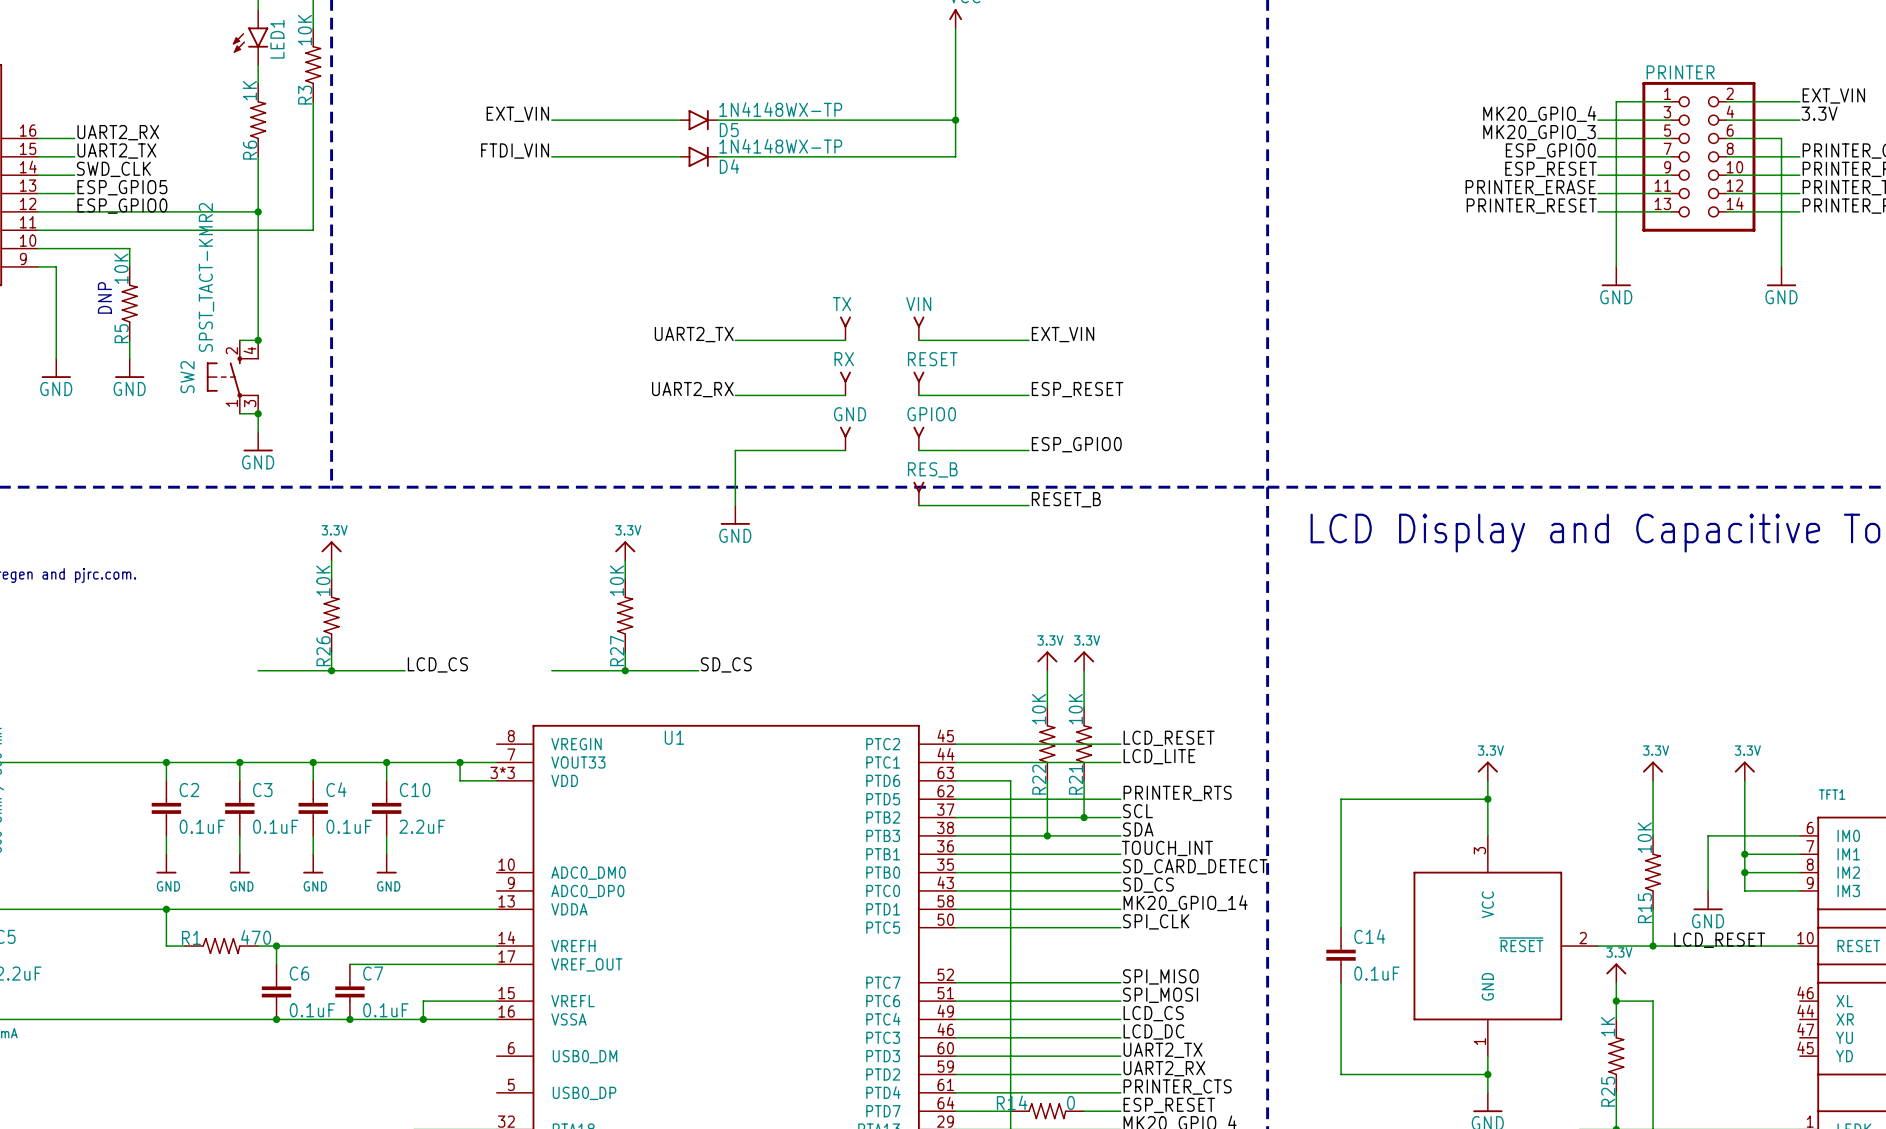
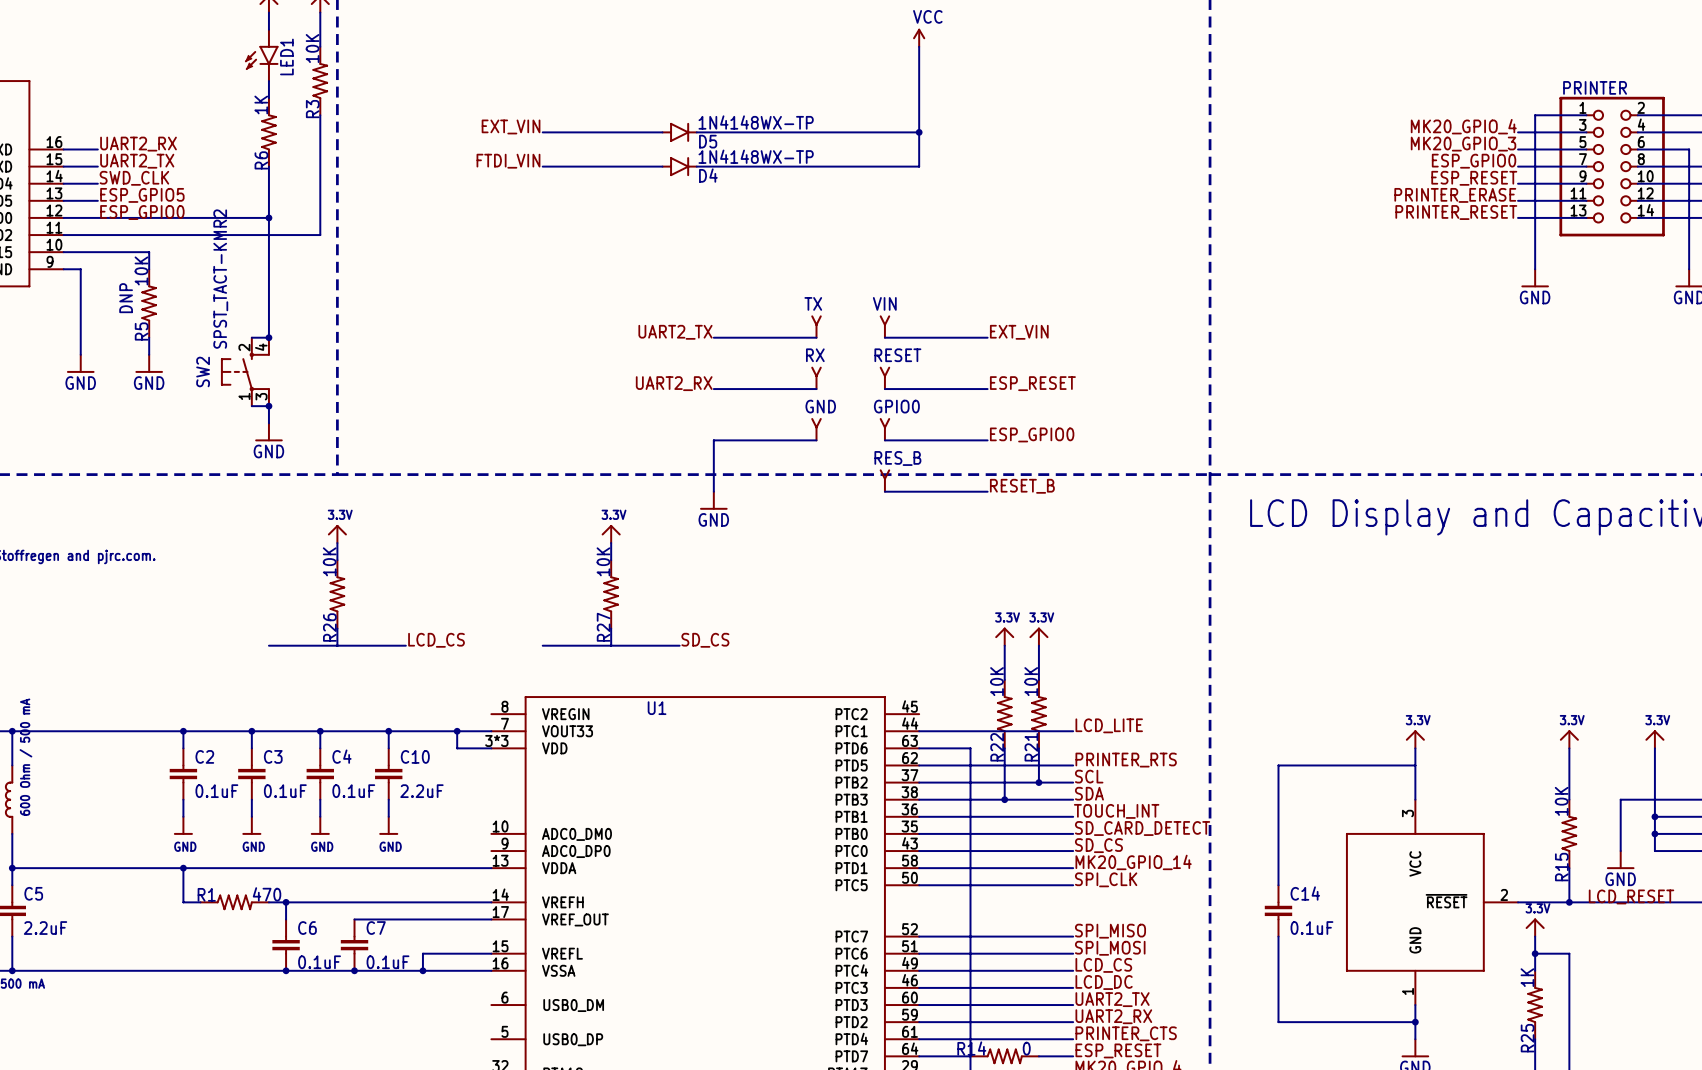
junction: (331, 670) -> none
junction: (625, 670) -> none
label: LCD_RESET (1169, 738) -> none
wire: (955, 744) (1120, 744) -> none
junction: (1487, 799) -> none

